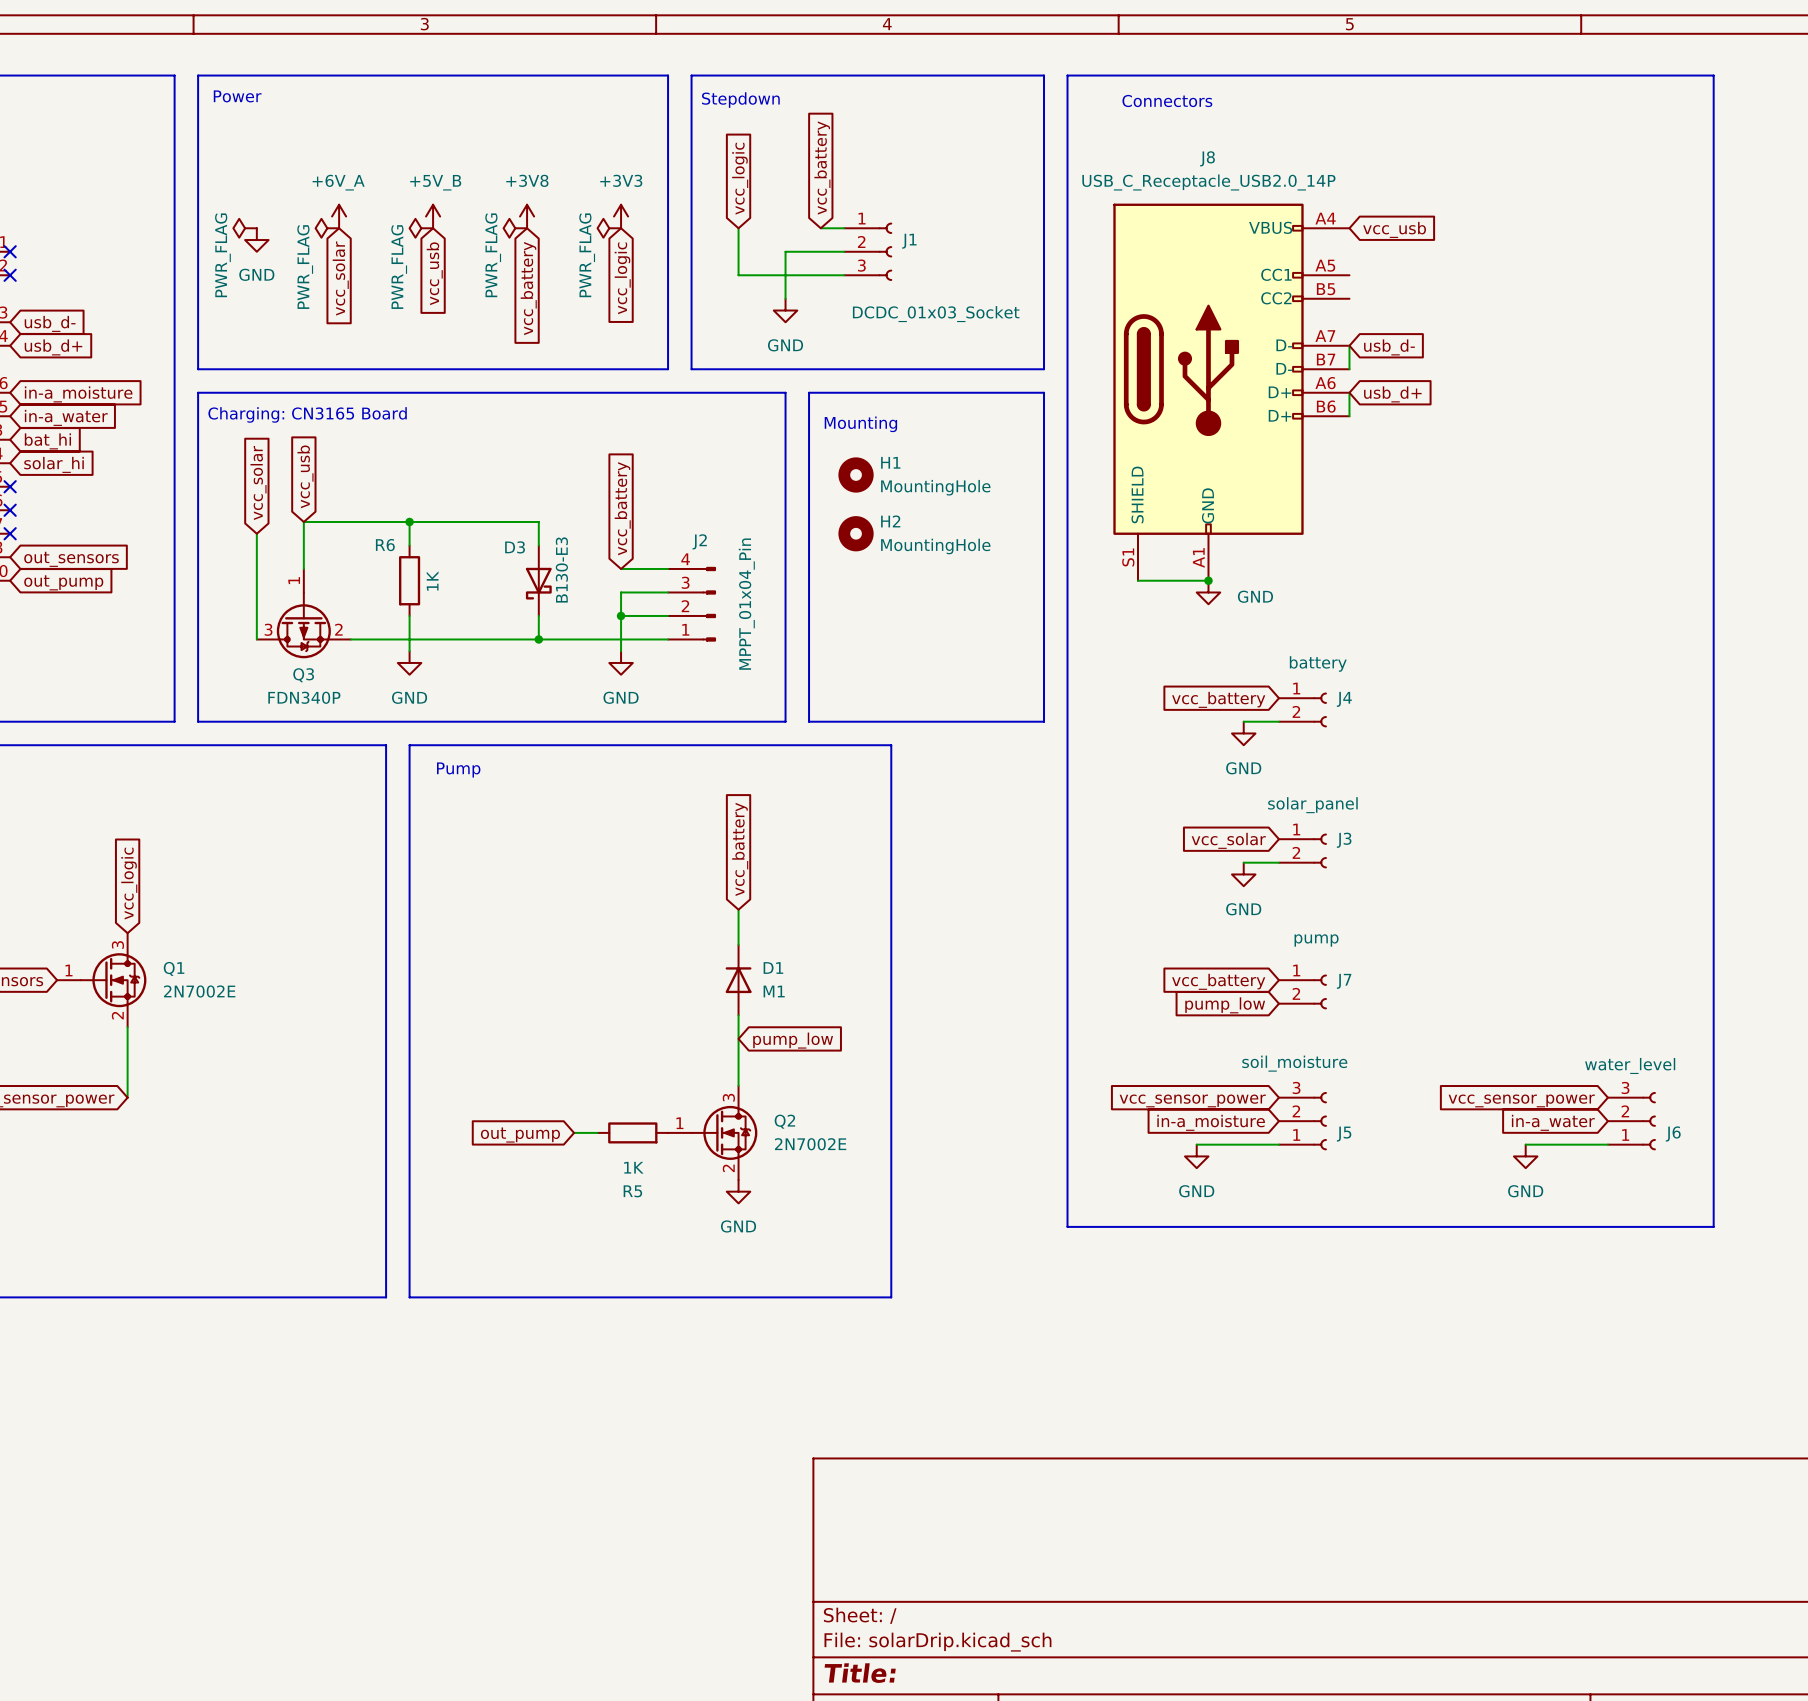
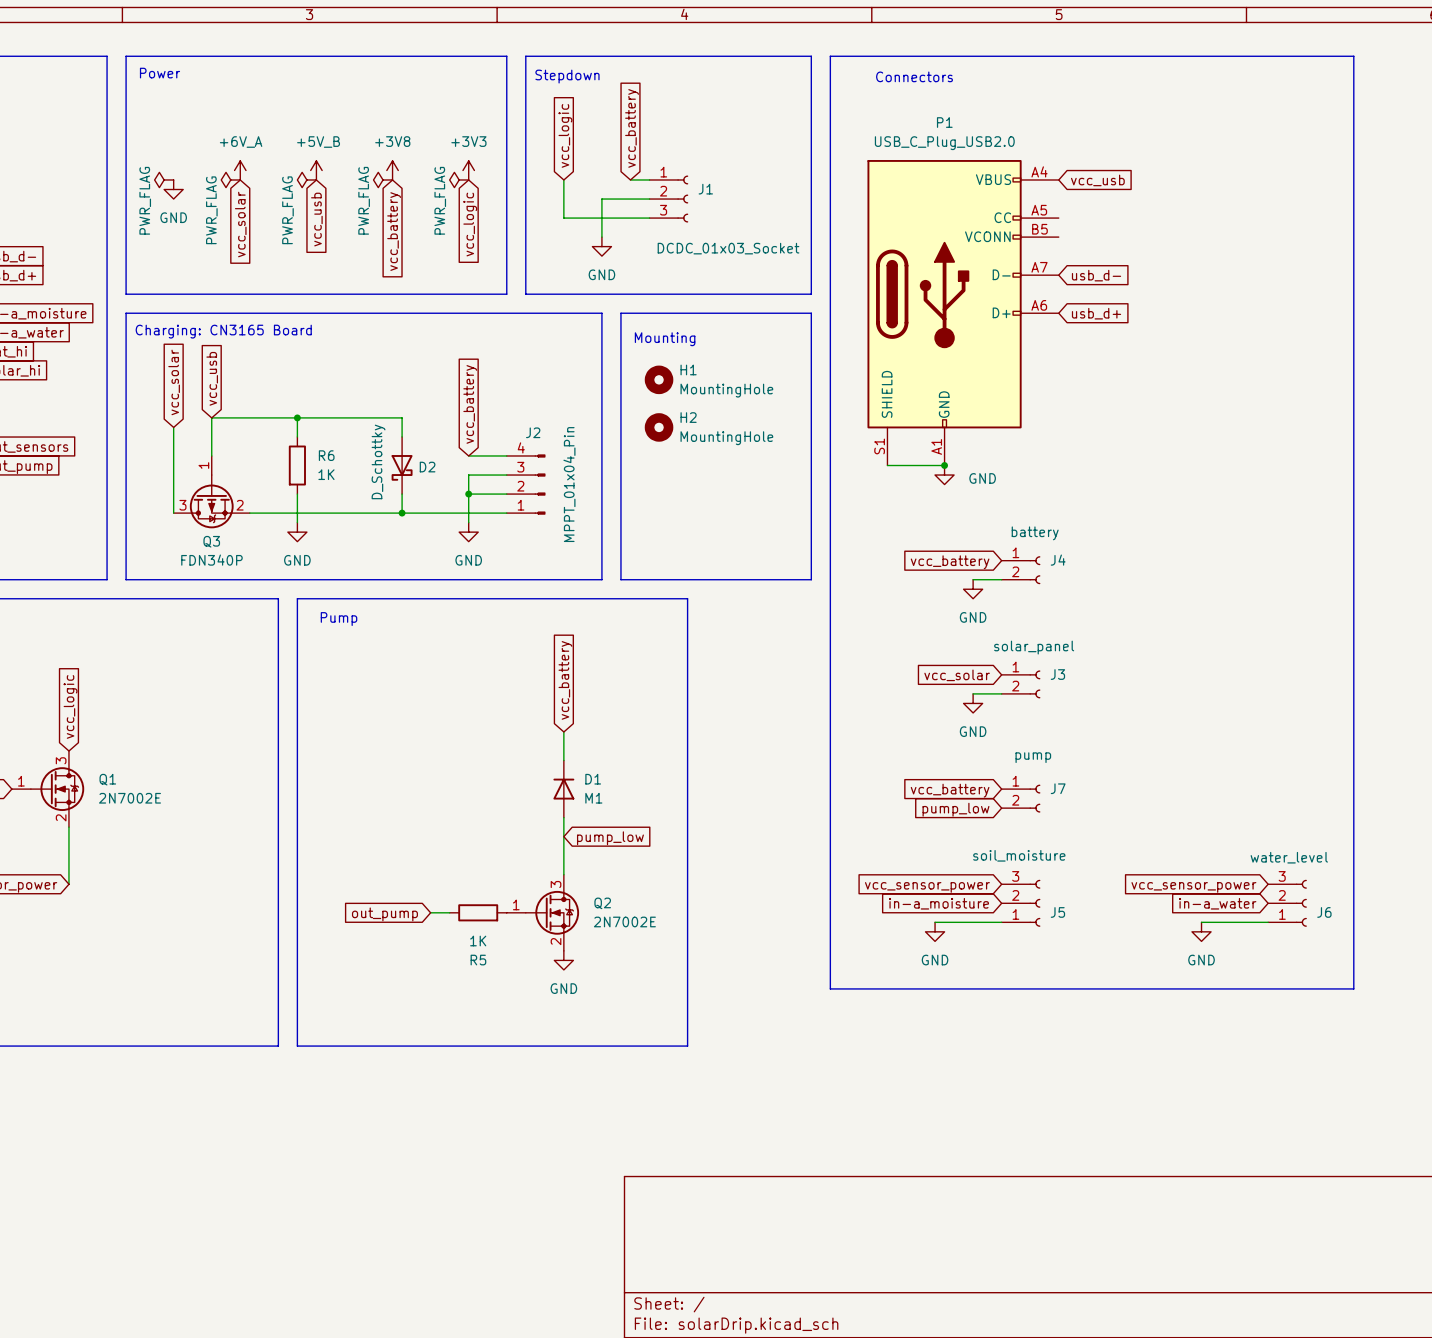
wire: (1349, 345) (1349, 369) -> none
J8: USB_C_Receptacle_USB2.0_14P (1231, 392) -> none
P1: none -> USB_C_Plug_USB2.0 (963, 312)
wire: (1349, 392) (1349, 416) -> none
R6 name position: R6 (385, 545) -> R6 (326, 455)
D3 name: D3 (515, 547) -> D2 (427, 467)
D3 value: B130-E3 (561, 569) -> D_Schottky (378, 461)
R6 value rotation: 0° (432, 581) -> 90° clockwise (326, 474)

